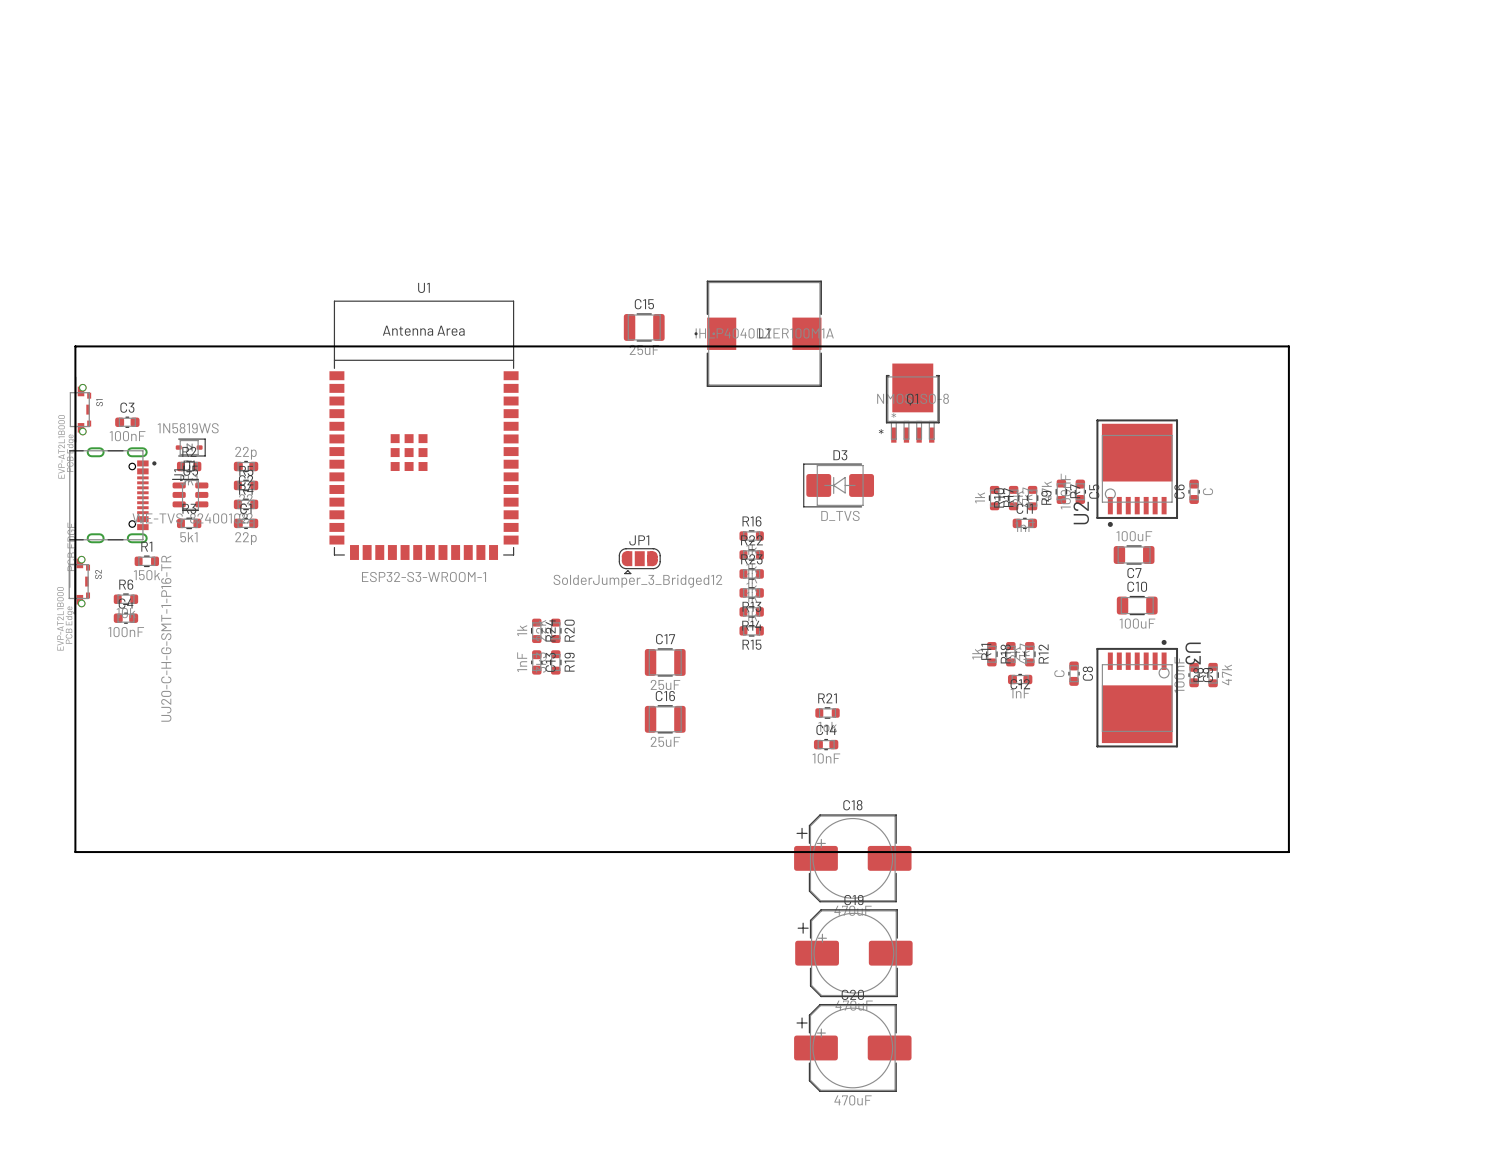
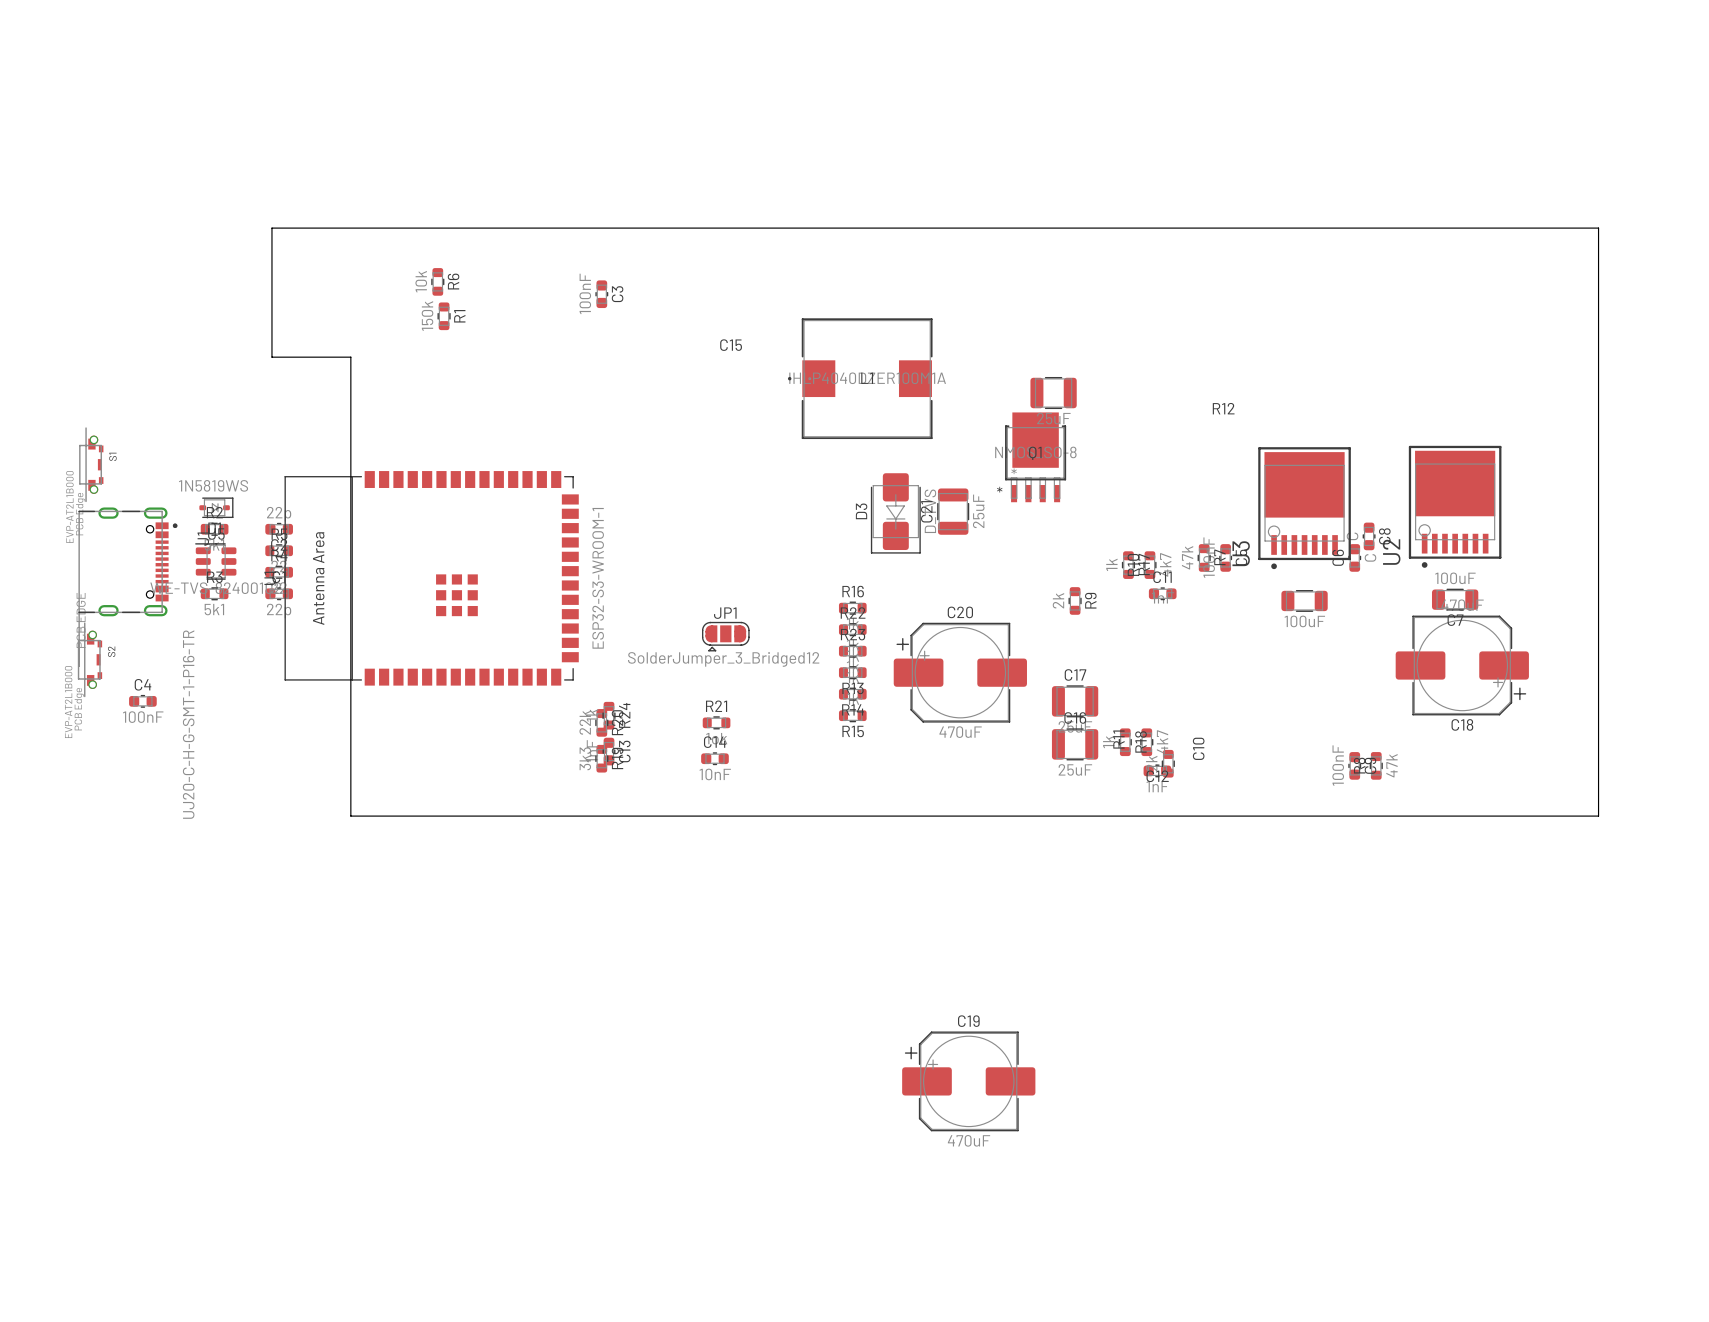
board edge: none -> (271, 228) (1598, 228) (1598, 816) (350, 816) (350, 357) (271, 357) (271, 228)
C15 position: (644, 327) -> (1053, 393)
board edge: (75, 346) (1288, 346) (1288, 852) (75, 852) (75, 346) -> none
C3 rotation: 0° (127, 422) -> 90° clockwise (601, 294)
C3 position: (127, 422) -> (601, 294)
U1 rotation: 0° (424, 430) -> 90° counterclockwise (431, 578)
C21: none -> 25uF (953, 511)
U2 position: (1137, 473) -> (1455, 506)
D3 rotation: 0° (838, 485) -> 90° counterclockwise (895, 513)
D3 position: (838, 485) -> (895, 513)
R9 position: (1032, 498) -> (1075, 600)
C7 position: (1134, 554) -> (1455, 599)
R1 rotation: 0° (146, 561) -> 90° clockwise (444, 316)
R1 position: (146, 561) -> (444, 316)
C10 name rotation: 0° (1137, 586) -> 90° counterclockwise (1198, 748)
C10 name position: C10 (1137, 586) -> C10 (1198, 748)
R6 rotation: 0° (125, 599) -> 90° clockwise (437, 281)
R6 position: (125, 599) -> (437, 281)
C10 position: (1137, 605) -> (1304, 600)
R20 position: (555, 630) -> (601, 722)
R12 name rotation: 0° (1043, 653) -> 90° clockwise (1223, 408)
R12 name position: R12 (1043, 653) -> R12 (1223, 408)
R12 position: (1029, 654) -> (1168, 763)
R19 position: (555, 662) -> (601, 758)
C17 position: (665, 662) -> (1075, 701)
C8 position: (1074, 673) -> (1369, 536)
U3 rotation: 0° (1137, 693) -> 180° (1304, 508)
U3 position: (1137, 693) -> (1304, 508)
R21 position: (827, 713) -> (716, 722)
C16 position: (665, 719) -> (1075, 744)
C14 position: (826, 744) -> (714, 758)
C18 rotation: 0° (852, 858) -> 180° (1462, 665)
C18 position: (852, 858) -> (1462, 665)
C20 position: (852, 1047) -> (960, 672)

